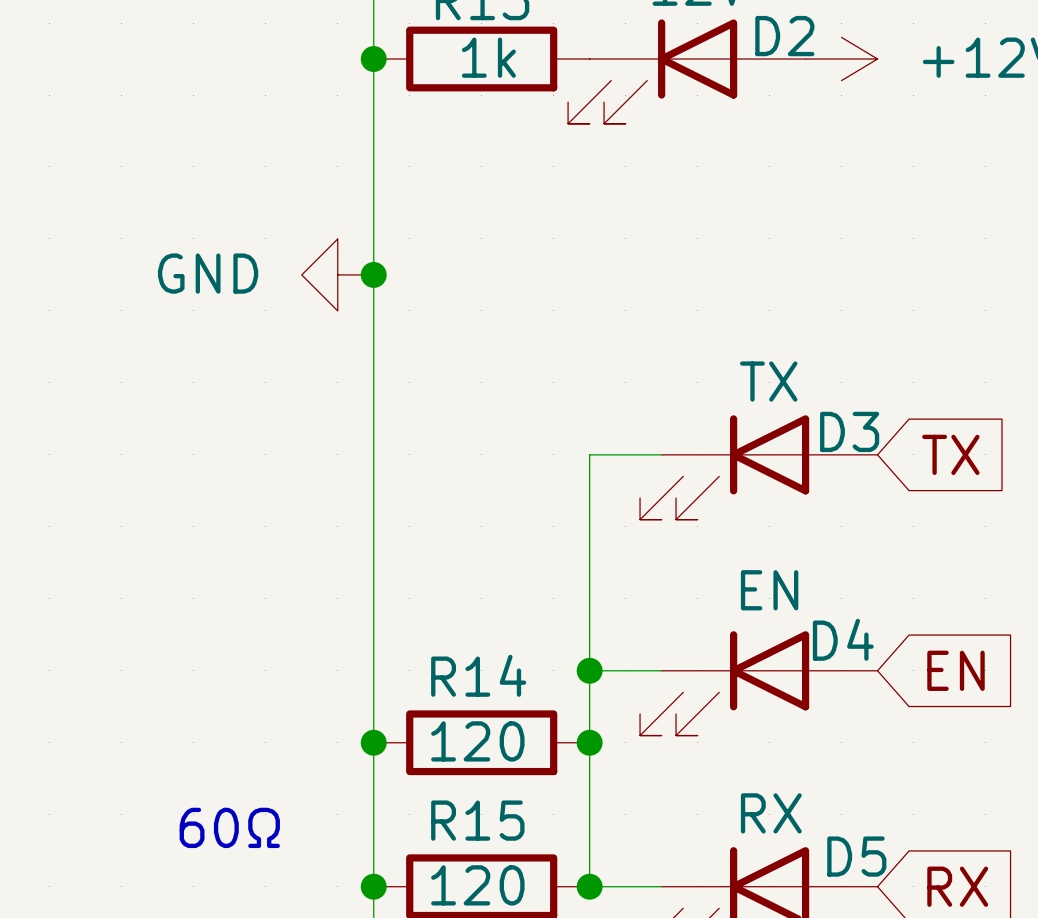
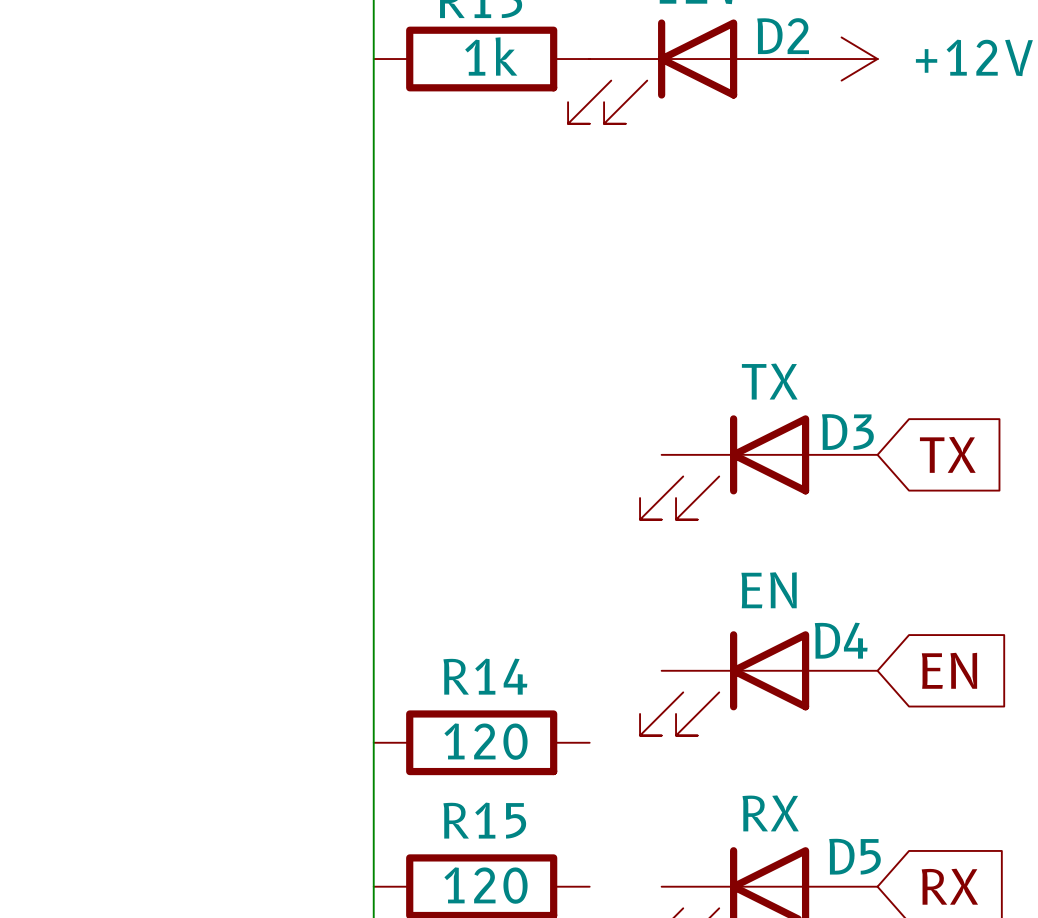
junction: (373, 59) -> none
power symbol: GND (337, 274) -> none
junction: (373, 274) -> none
wire: (661, 454) (589, 454) (589, 886) (661, 886) -> none
wire: (589, 670) (661, 670) -> none
junction: (589, 670) -> none
junction: (373, 742) -> none
junction: (589, 742) -> none
text: 60Ω (229, 827) -> none
junction: (373, 886) -> none
junction: (589, 886) -> none

